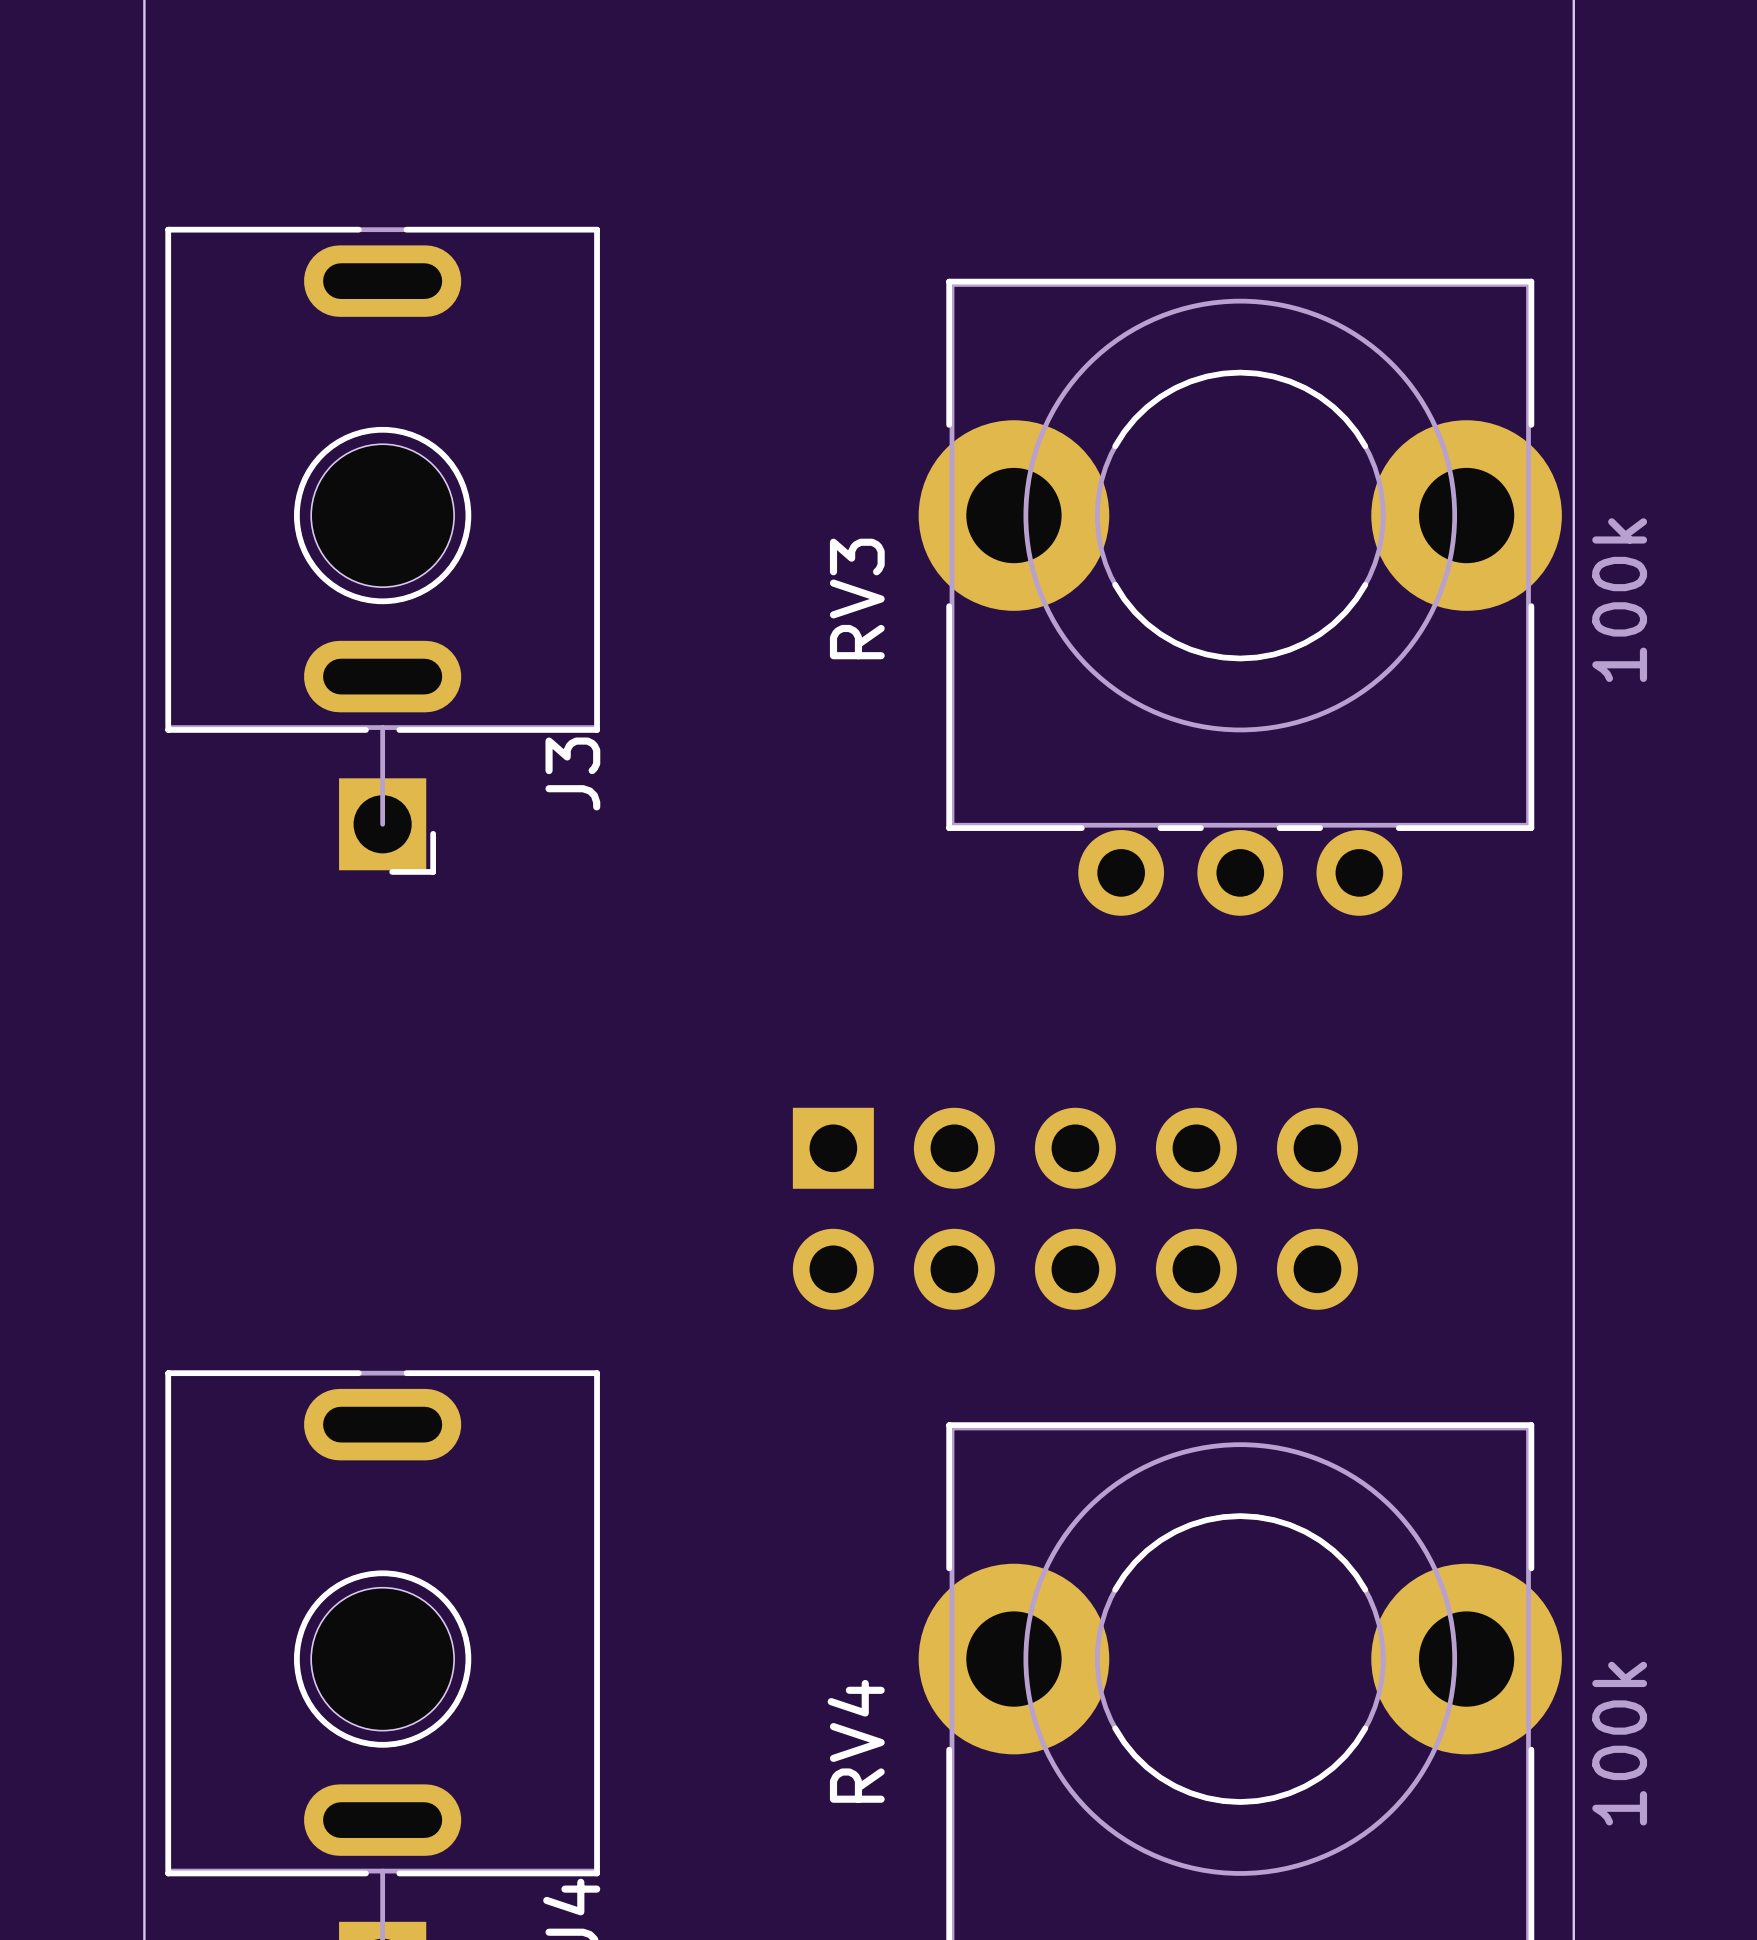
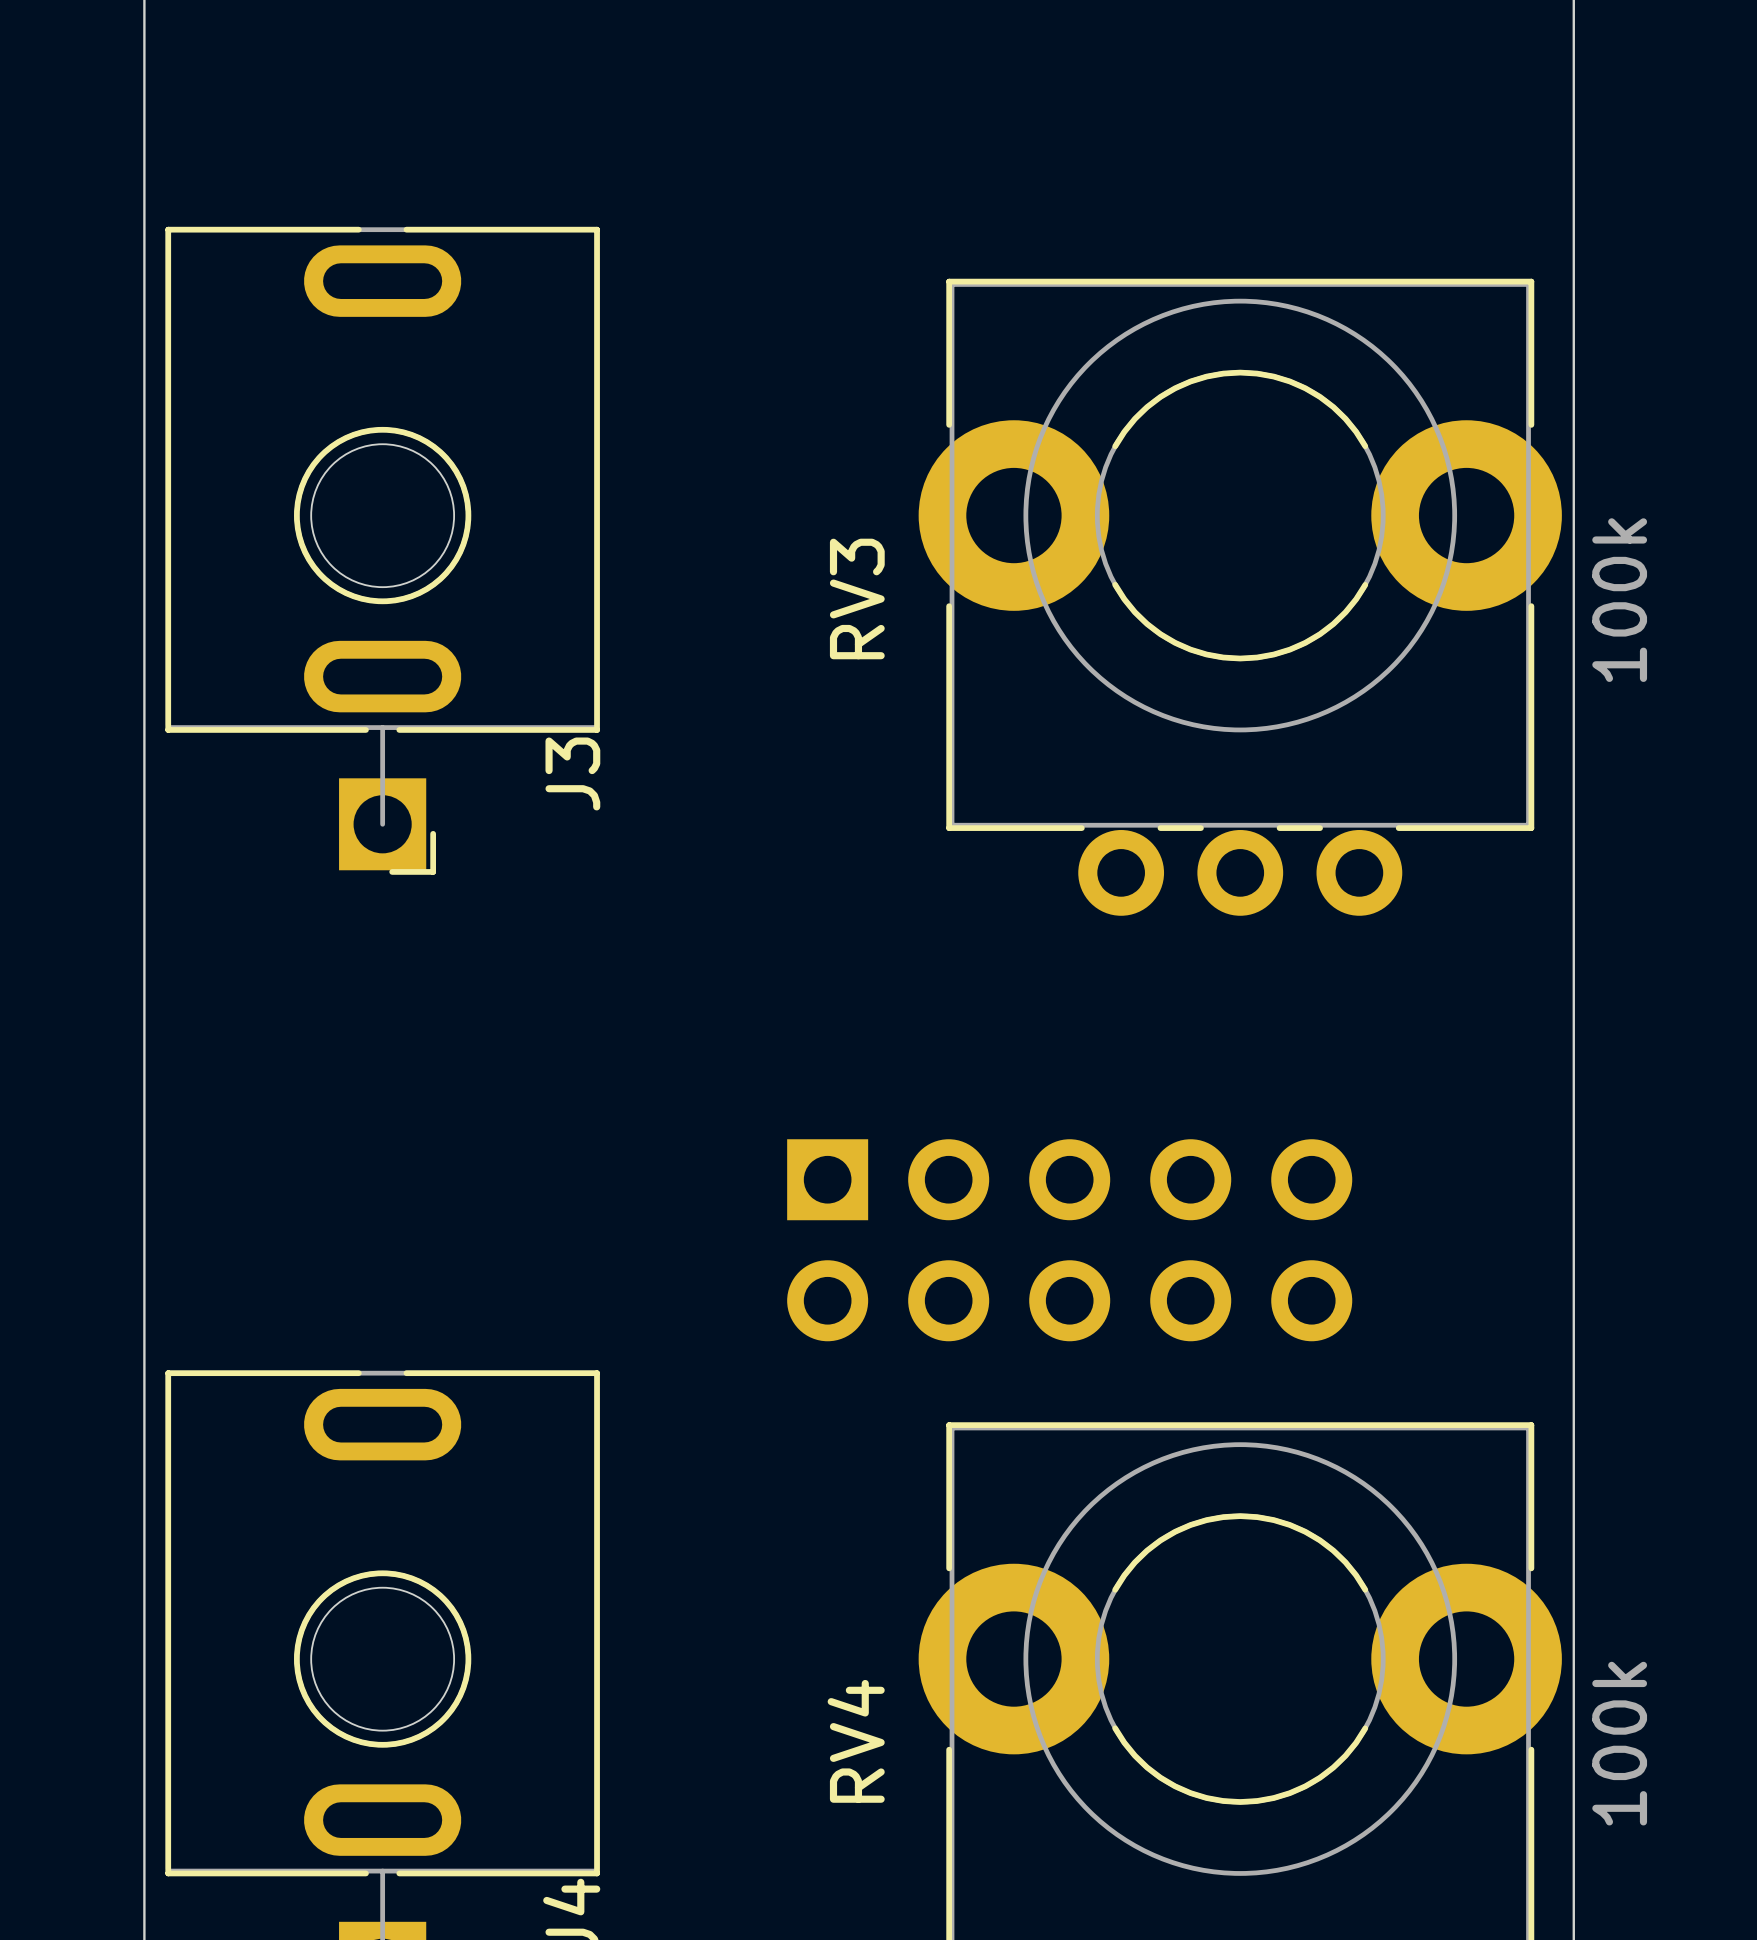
part position: (1075, 1208) -> (1069, 1240)

